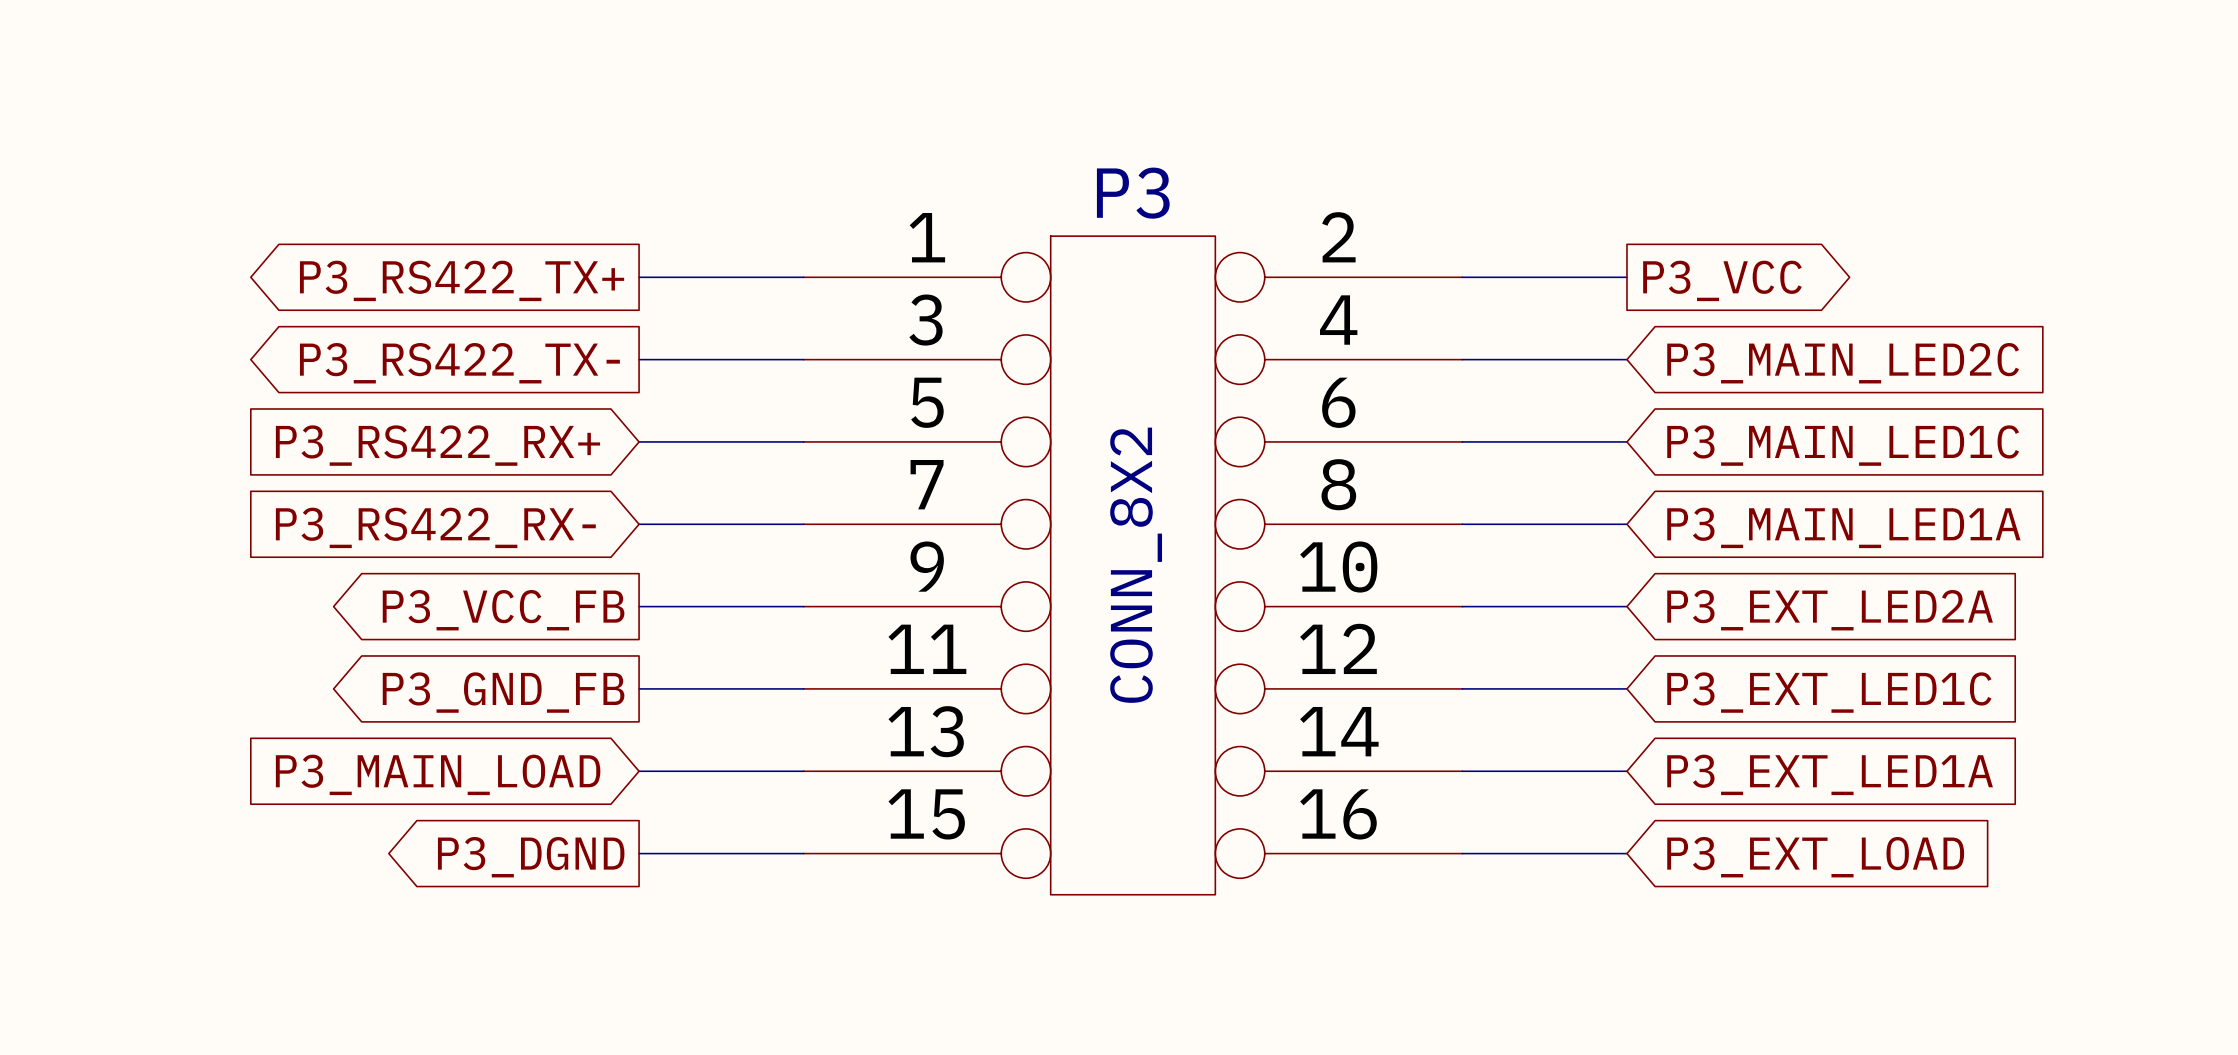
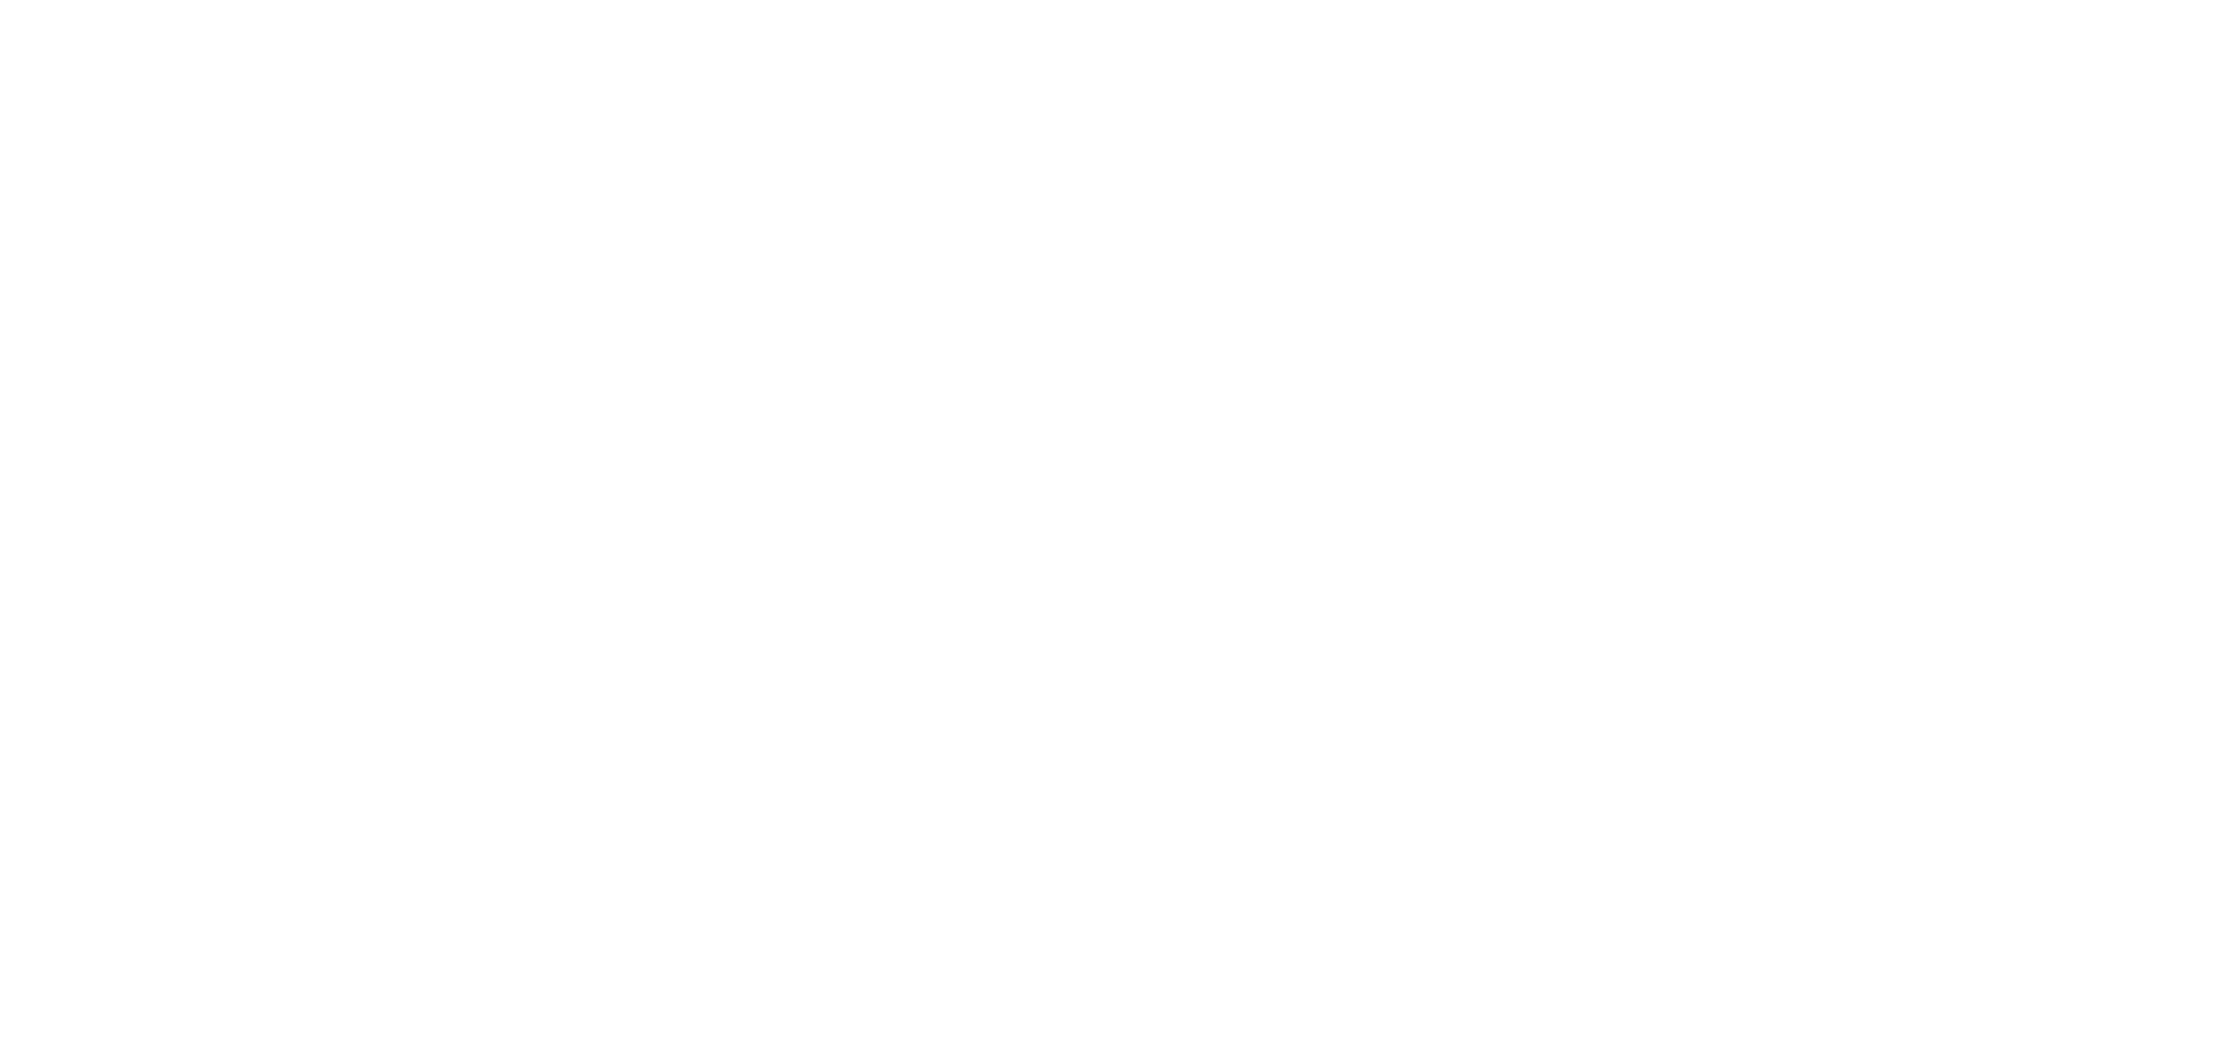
wire: (639, 277) (803, 277) -> none
wire: (1462, 277) (1626, 277) -> none
global label: P3_RS422_TX+ (462, 280) -> none
global label: P3_VCC (1722, 280) -> none
wire: (639, 359) (803, 359) -> none
wire: (1462, 359) (1626, 359) -> none
global label: P3_RS422_TX- (459, 363) -> none
global label: P3_MAIN_LED2C (1843, 363) -> none
wire: (639, 441) (803, 441) -> none
wire: (1462, 441) (1626, 441) -> none
global label: P3_RS422_RX+ (437, 445) -> none
global label: P3_MAIN_LED1C (1843, 445) -> none
wire: (639, 524) (803, 524) -> none
wire: (1462, 524) (1626, 524) -> none
global label: P3_RS422_RX- (435, 527) -> none
global label: P3_MAIN_LED1A (1843, 527) -> none
P3: CONN_8X2 (1133, 565) -> none
wire: (639, 606) (803, 606) -> none
wire: (1462, 606) (1626, 606) -> none
global label: P3_VCC_FB (503, 610) -> none
global label: P3_EXT_LED2A (1830, 610) -> none
wire: (639, 688) (803, 688) -> none
wire: (1462, 688) (1626, 688) -> none
global label: P3_GND_FB (503, 692) -> none
global label: P3_EXT_LED1C (1829, 692) -> none
wire: (639, 771) (803, 771) -> none
wire: (1462, 771) (1626, 771) -> none
global label: P3_MAIN_LOAD (438, 774) -> none
global label: P3_EXT_LED1A (1830, 774) -> none
wire: (639, 853) (803, 853) -> none
wire: (1462, 853) (1626, 853) -> none
global label: P3_DGND (531, 857) -> none
global label: P3_EXT_LOAD (1815, 857) -> none

